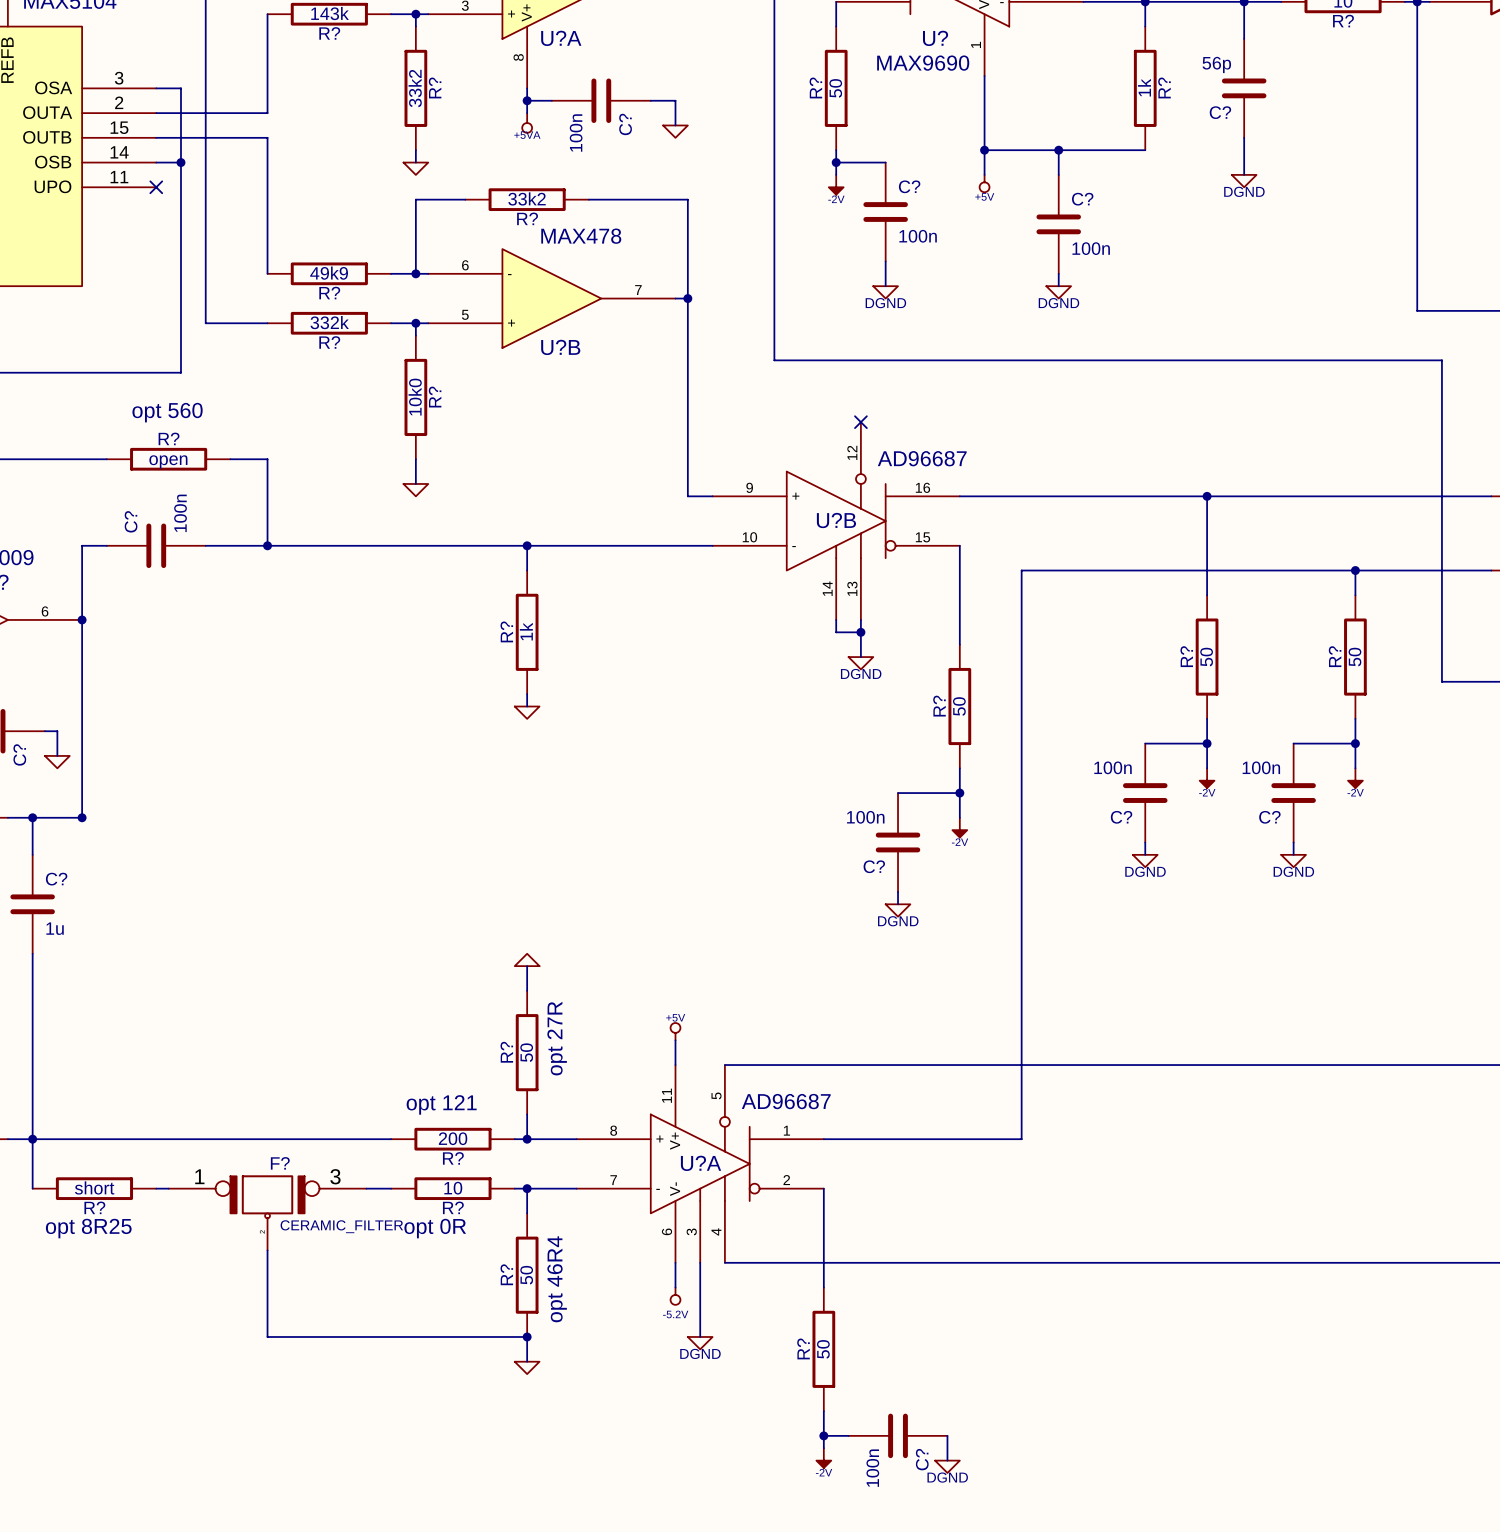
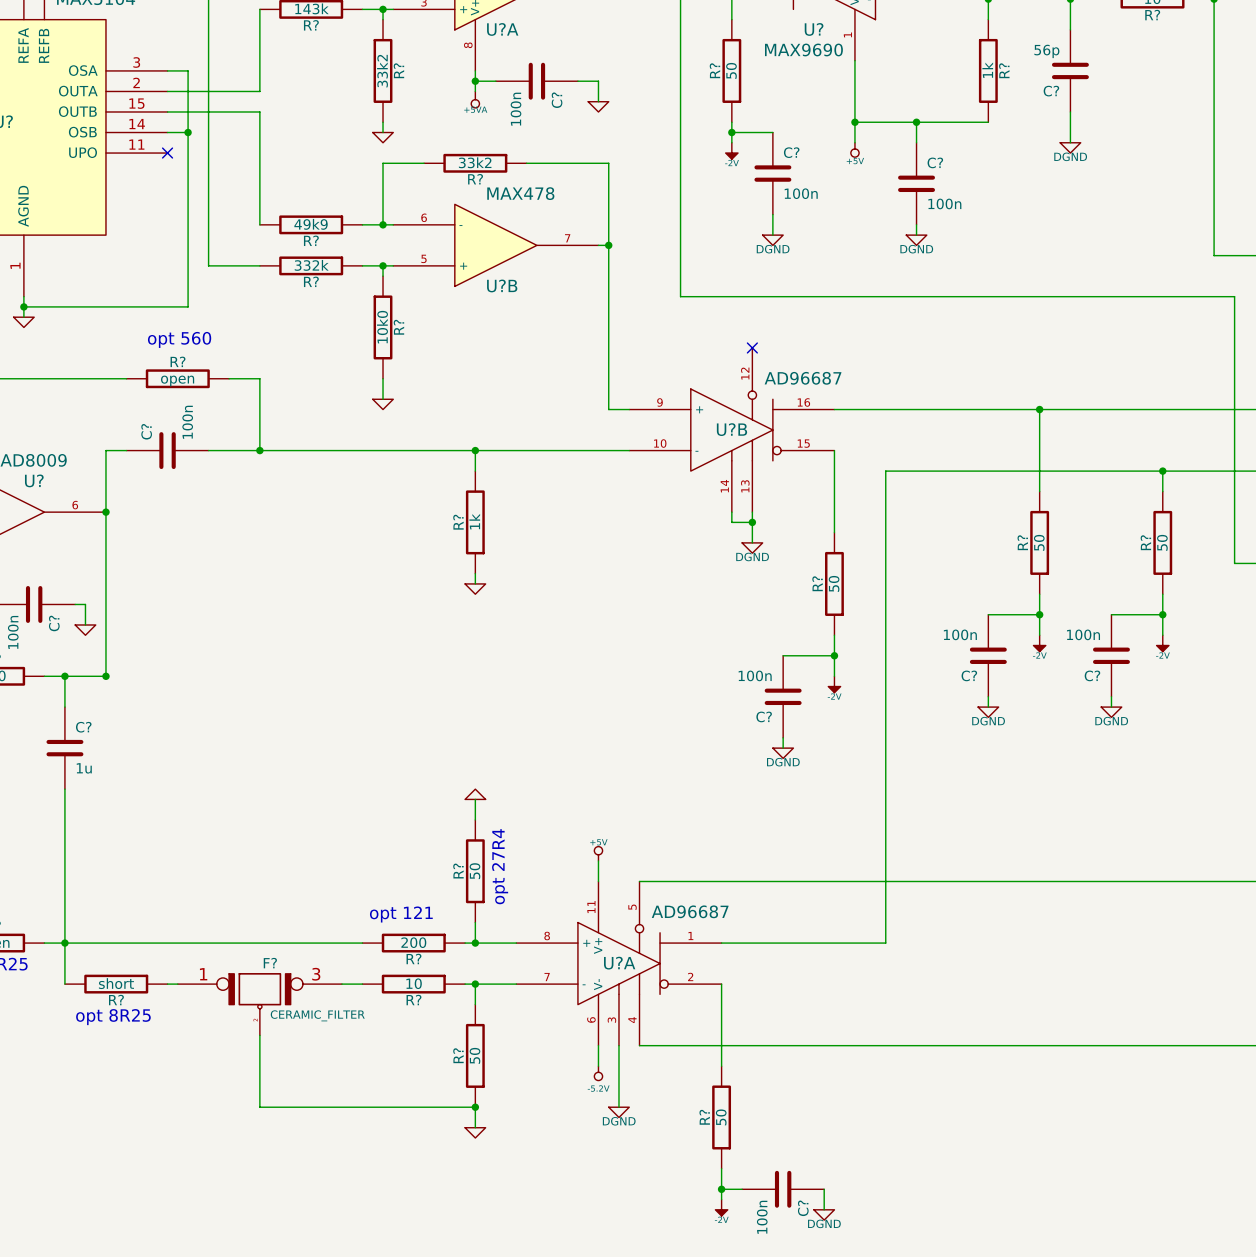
text: opt 27R (557, 1038) -> opt 27R4 (500, 866)
text: opt 0R (435, 1228) -> none
text: opt 46R4 (557, 1279) -> none

